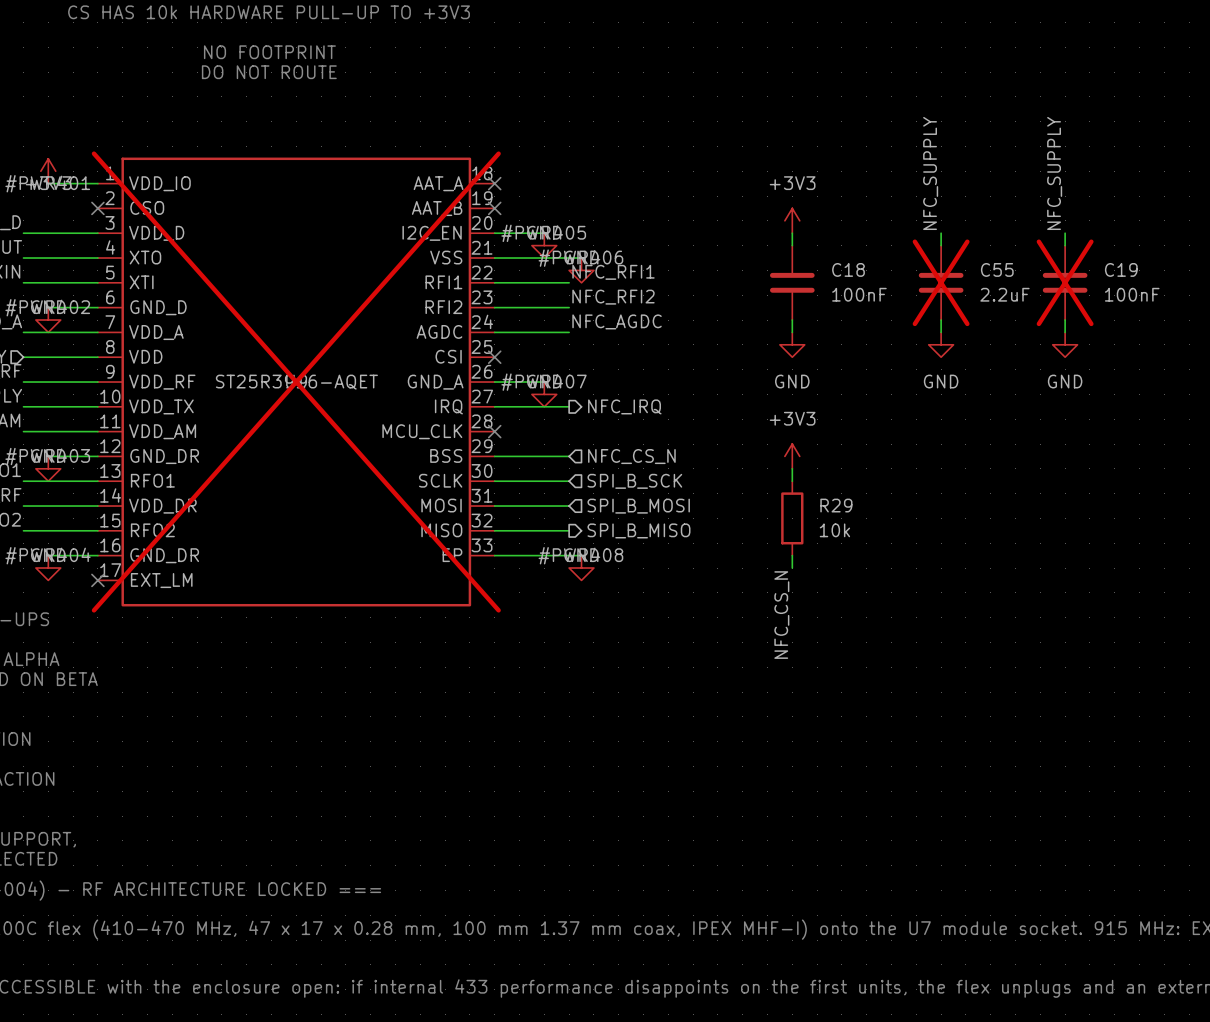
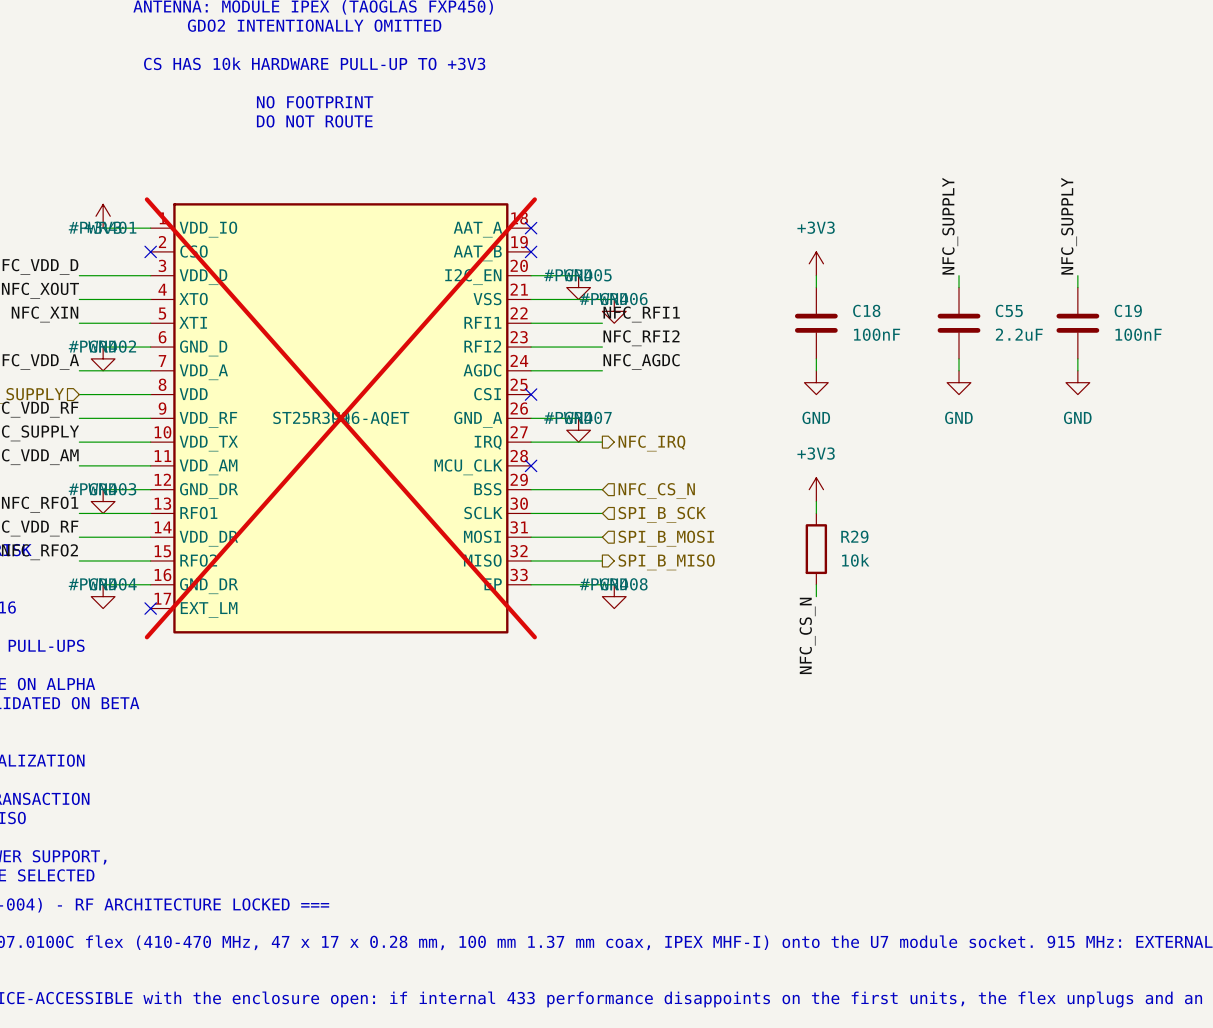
C55 do-not-place cross: (941, 282) -> none
C19 do-not-place cross: (1065, 282) -> none

